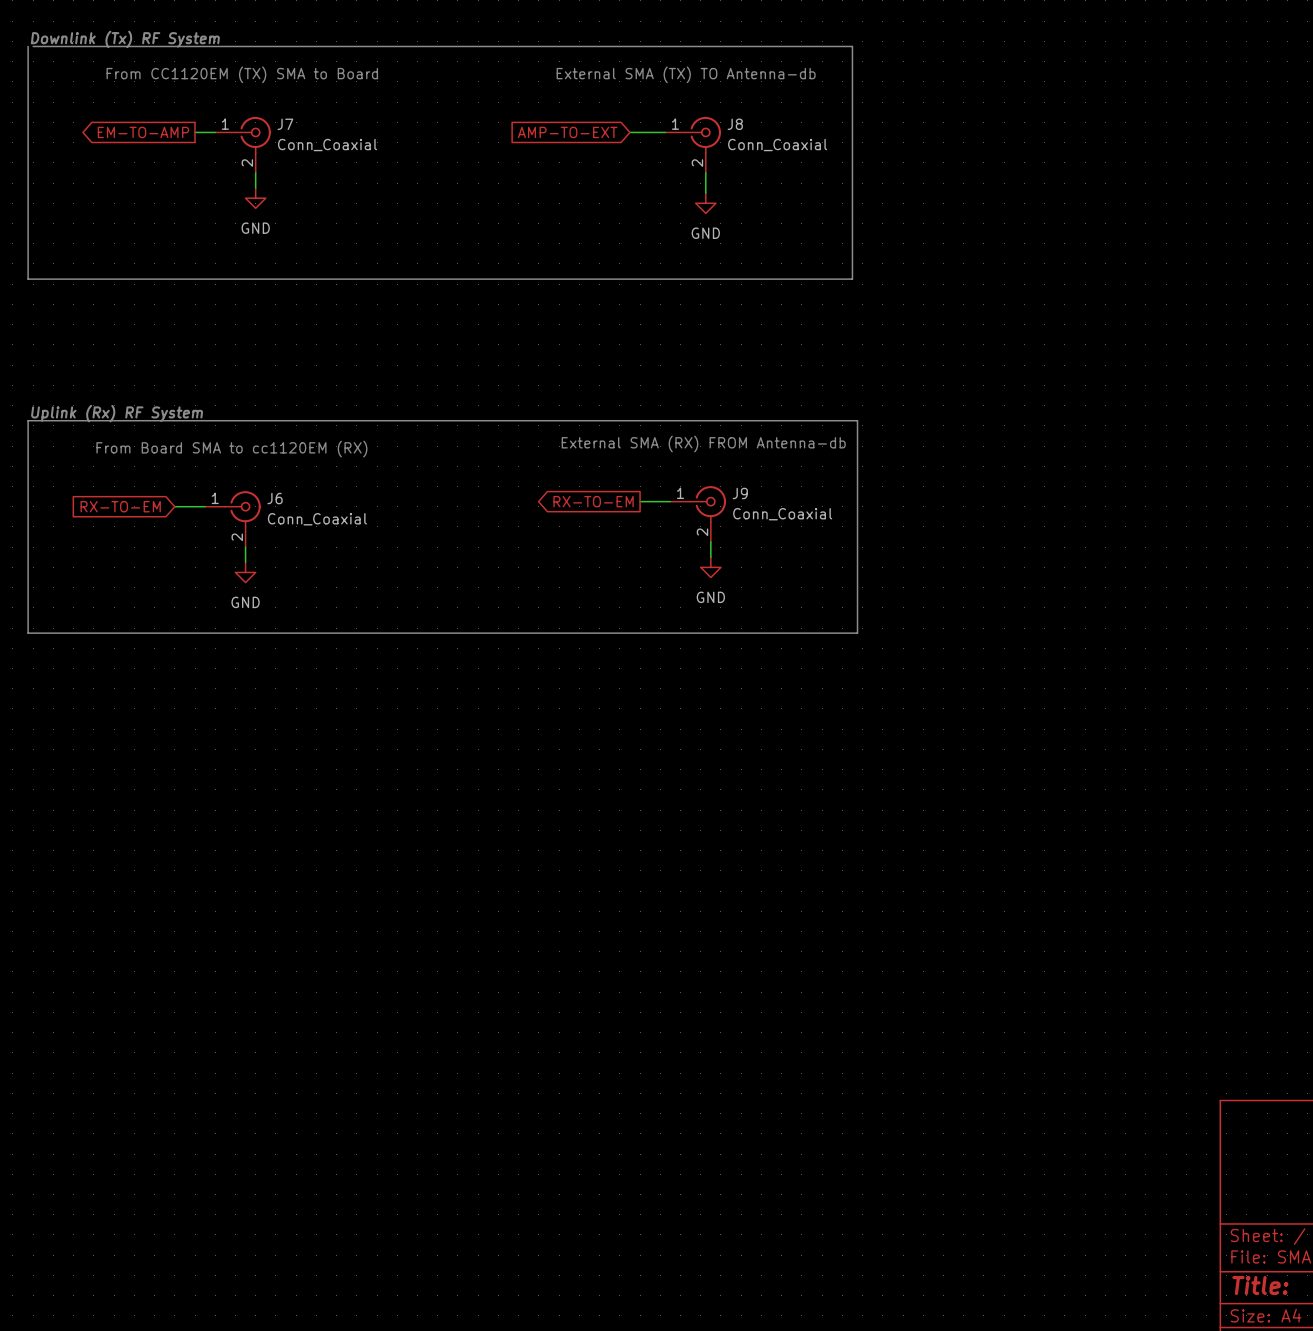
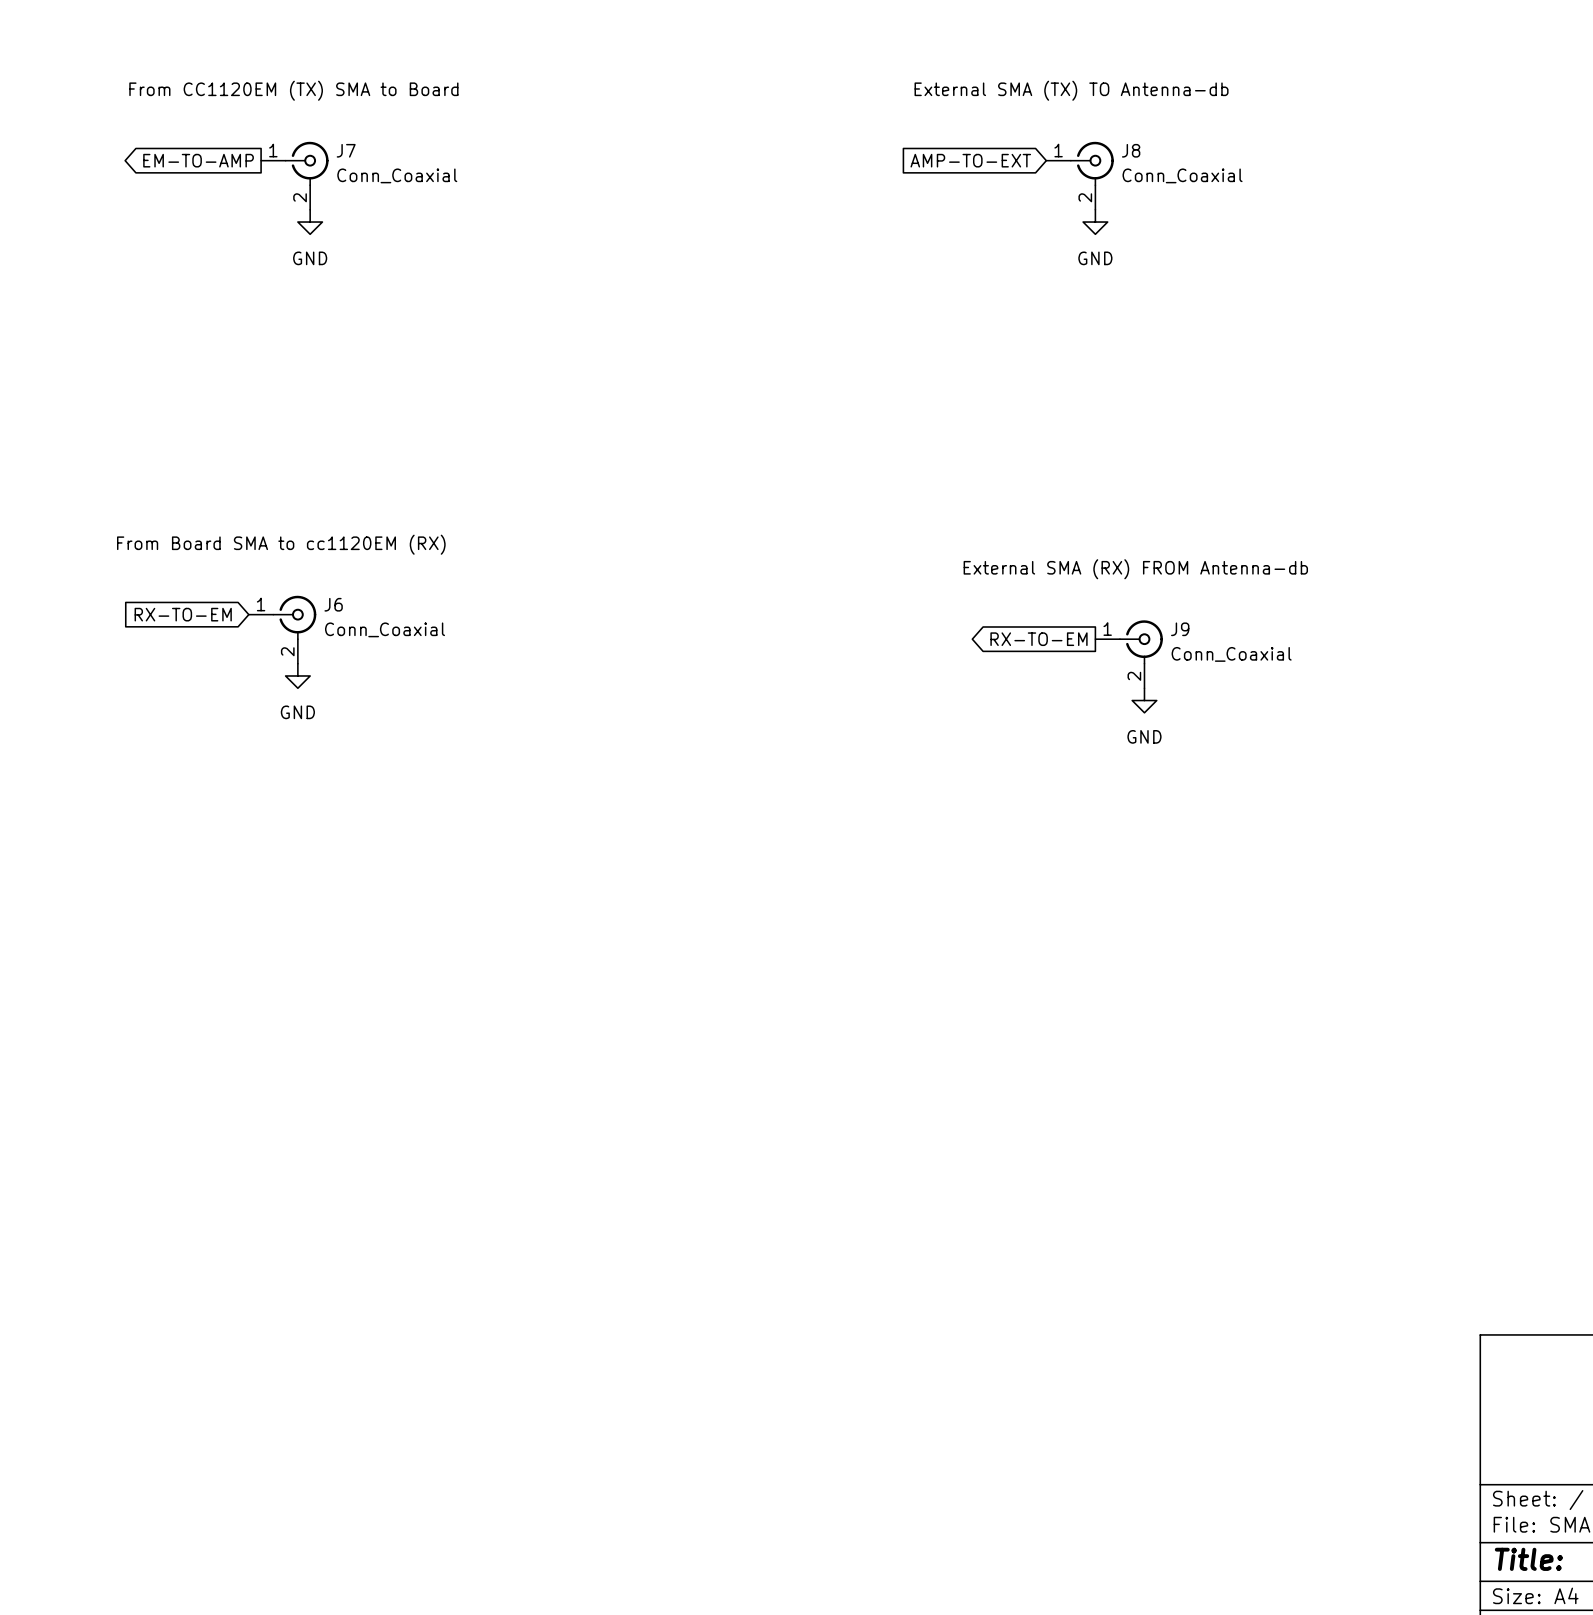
text: Downlink (Tx) RF System (125, 39) -> none
line: (28, 46) (28, 279) (852, 279) (852, 46) (33, 46) -> none
text position: External SMA (TX) TO Antenna-db (686, 74) -> External SMA (TX) TO Antenna-db (1071, 90)
global label position: EM-TO-AMP (143, 132) -> EM-TO-AMP (198, 160)
global label: AMP-TO-EXT (567, 132) -> none
wire: (629, 132) (665, 132) -> none
global label: none -> AMP-TO-EXT (970, 160)
J8 position: (693, 144) -> (1080, 175)
wire: (705, 172) (705, 193) -> none
power symbol position: GND (255, 198) -> GND (310, 222)
power symbol position: GND (705, 203) -> GND (1095, 222)
text: Uplink (Rx) RF System (117, 413) -> none
line: (28, 420) (857, 420) (857, 633) (28, 633) (28, 420) -> none
text: External SMA (RX) FROM Antenna-db (703, 443) -> none
text: none -> External SMA (RX) FROM Antenna-db (1135, 569)
global label: RX-TO-EM (593, 501) -> none
wire: (640, 501) (670, 501) -> none
global label position: RX-TO-EM (120, 506) -> RX-TO-EM (183, 614)
wire: (174, 506) (205, 506) -> none
J9 position: (698, 514) -> (1129, 654)
global label: none -> RX-TO-EM (1039, 639)
wire: (710, 542) (710, 557) -> none
power symbol: GND (710, 567) -> none
power symbol position: GND (245, 572) -> GND (297, 675)
power symbol: none -> GND (1144, 700)

